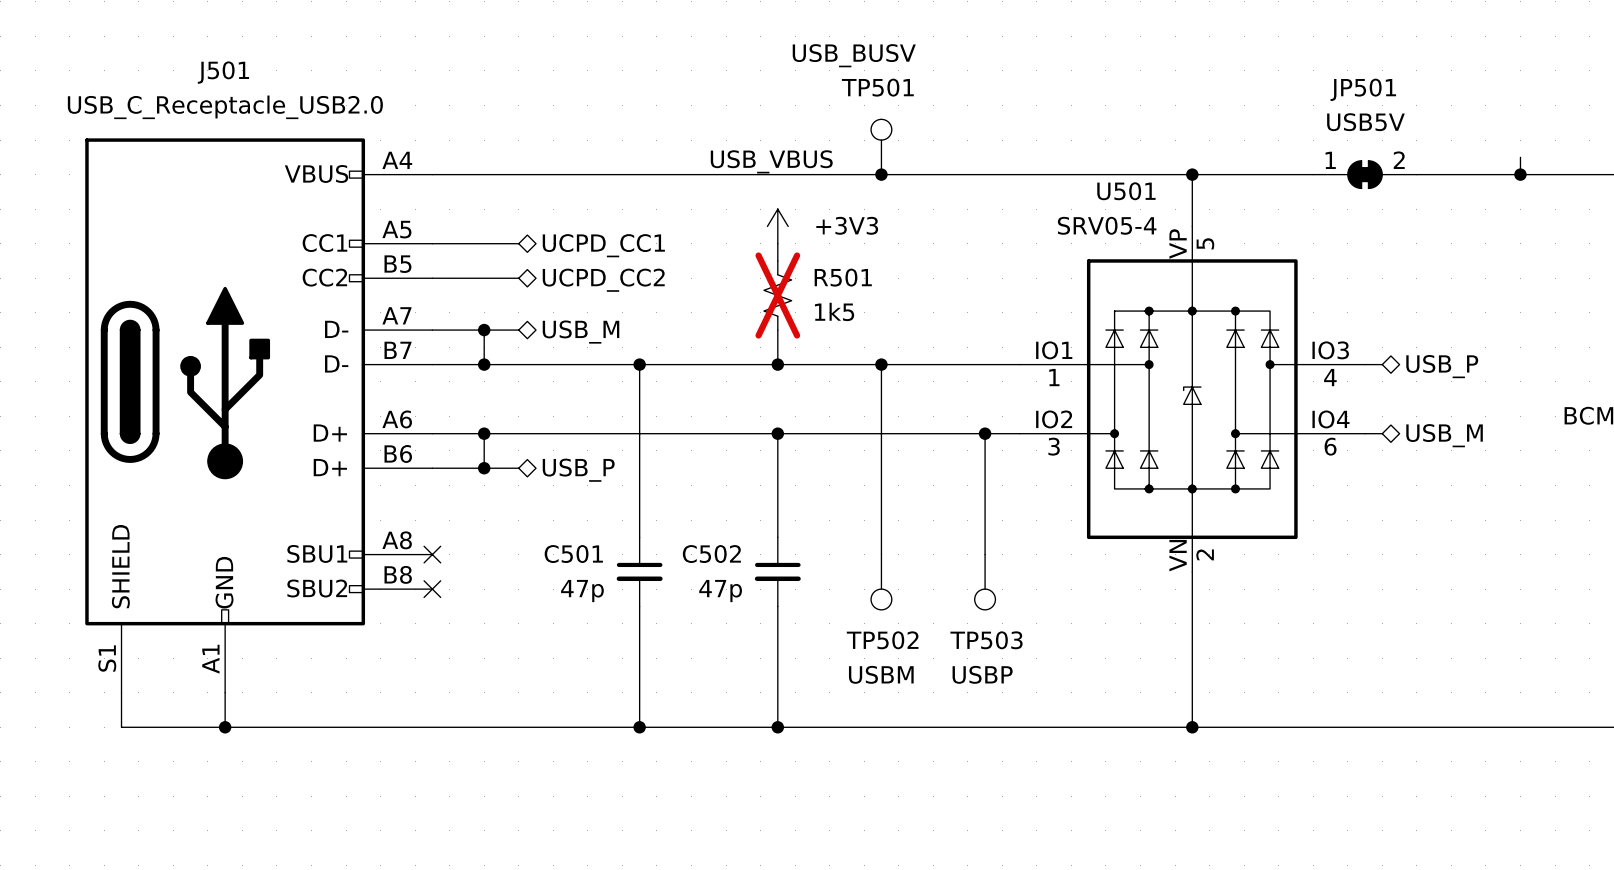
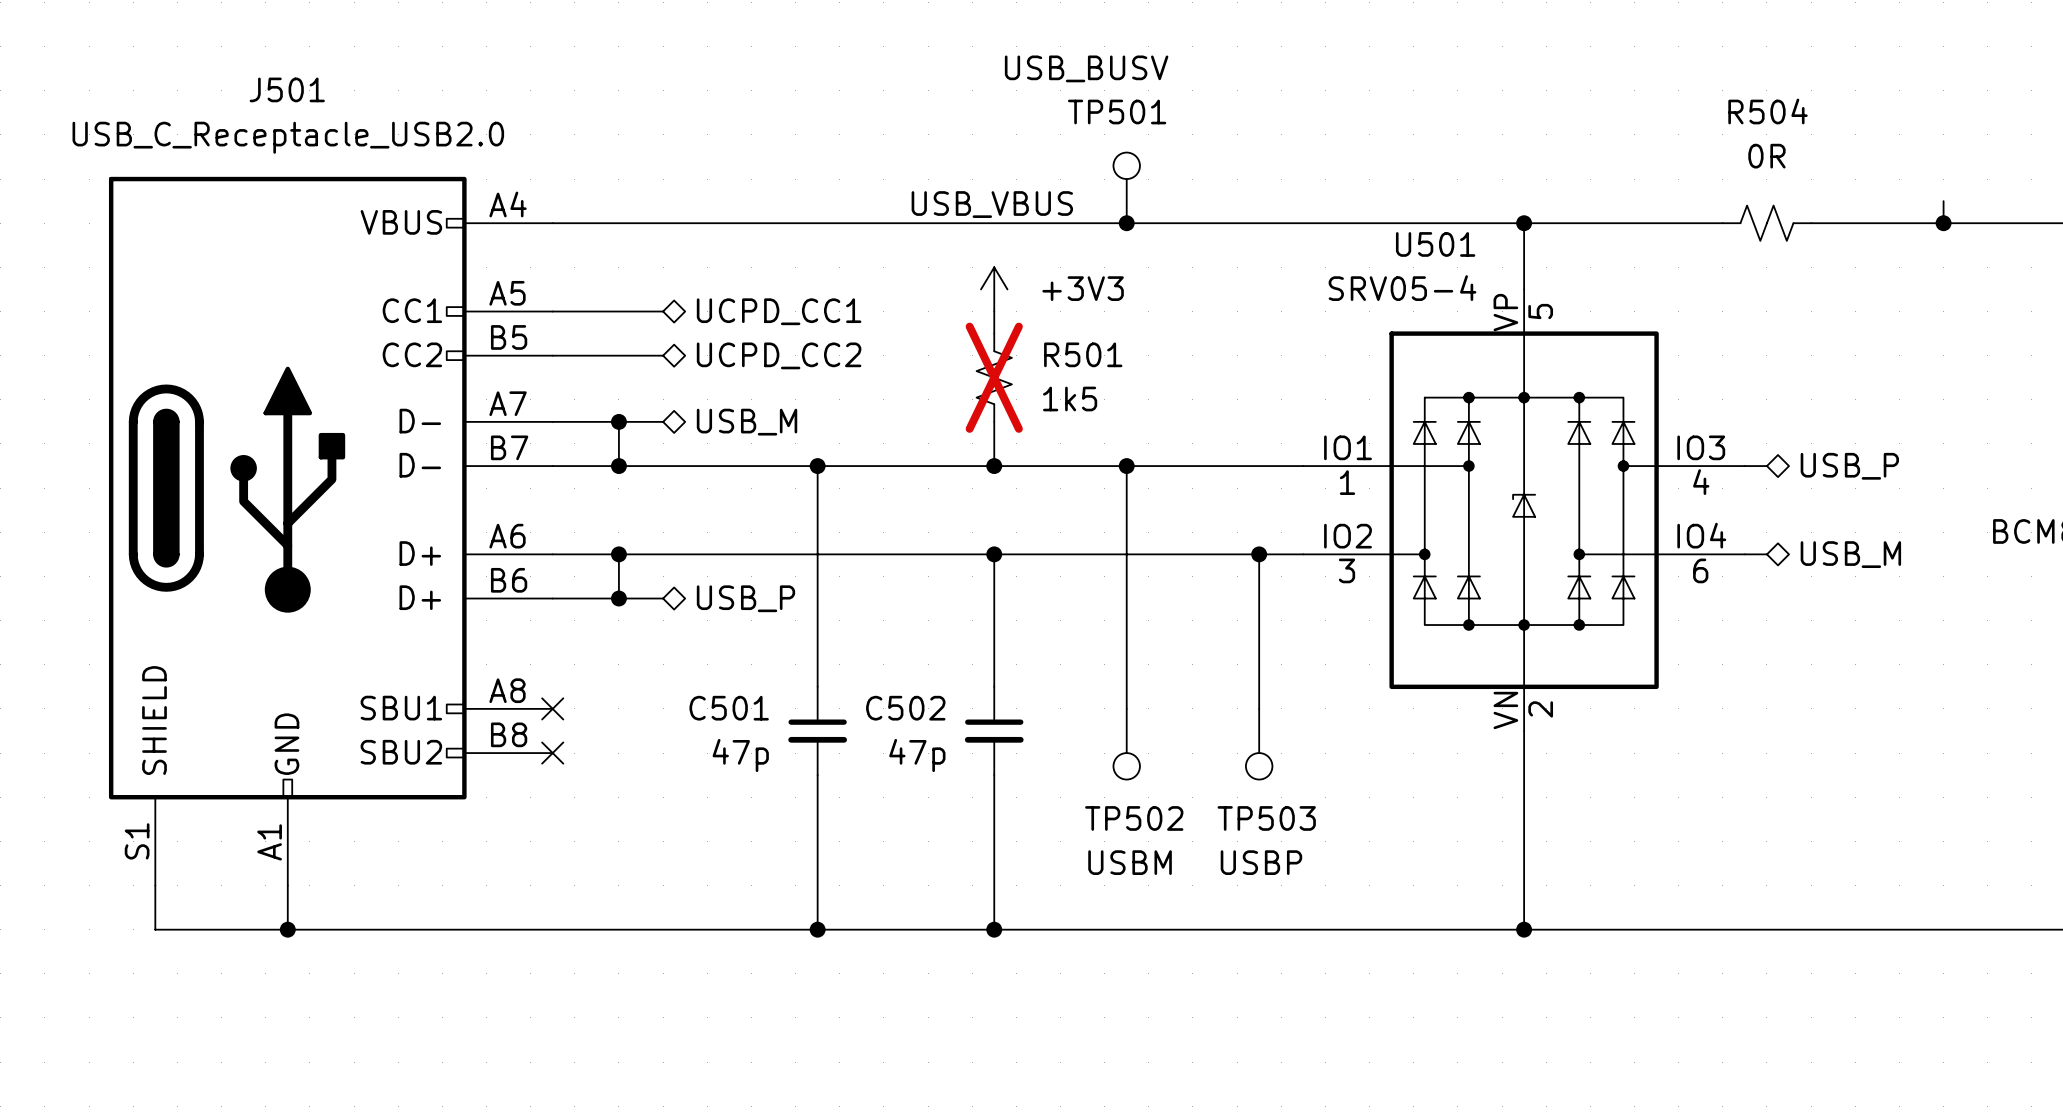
JP501: USB5V (1365, 174) -> none
R504: none -> 0R (1766, 223)

